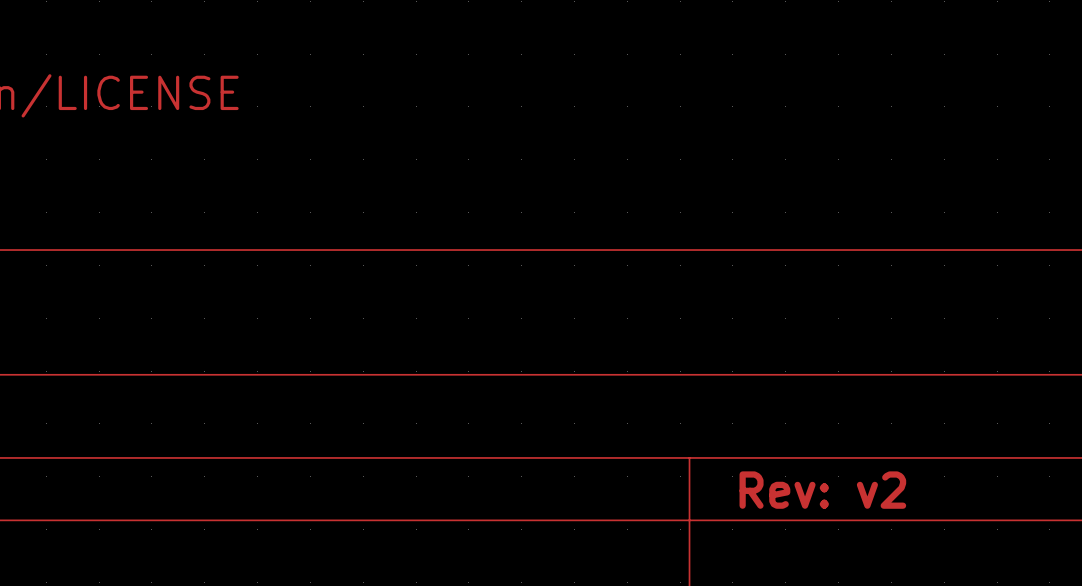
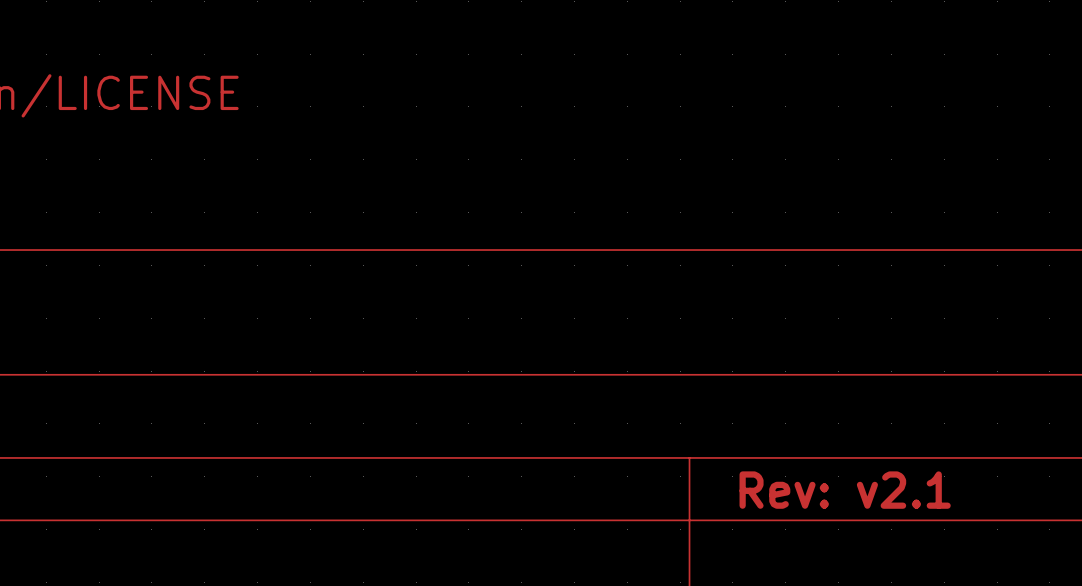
title block: Rev: v2 (822, 490) -> Rev: v2.1 (845, 490)

